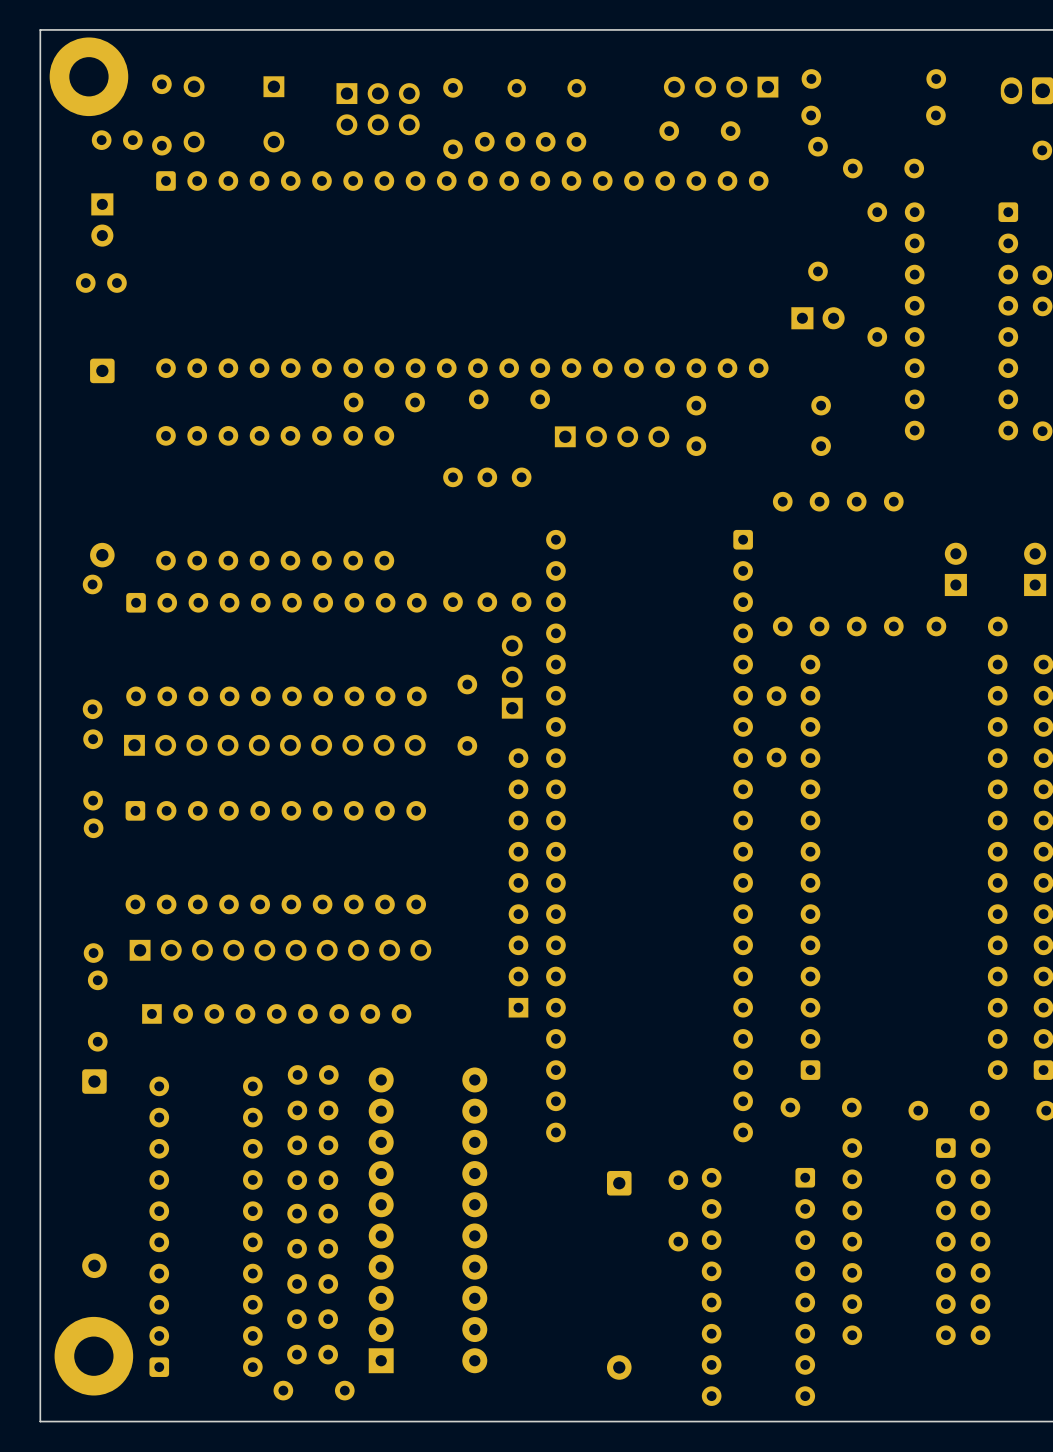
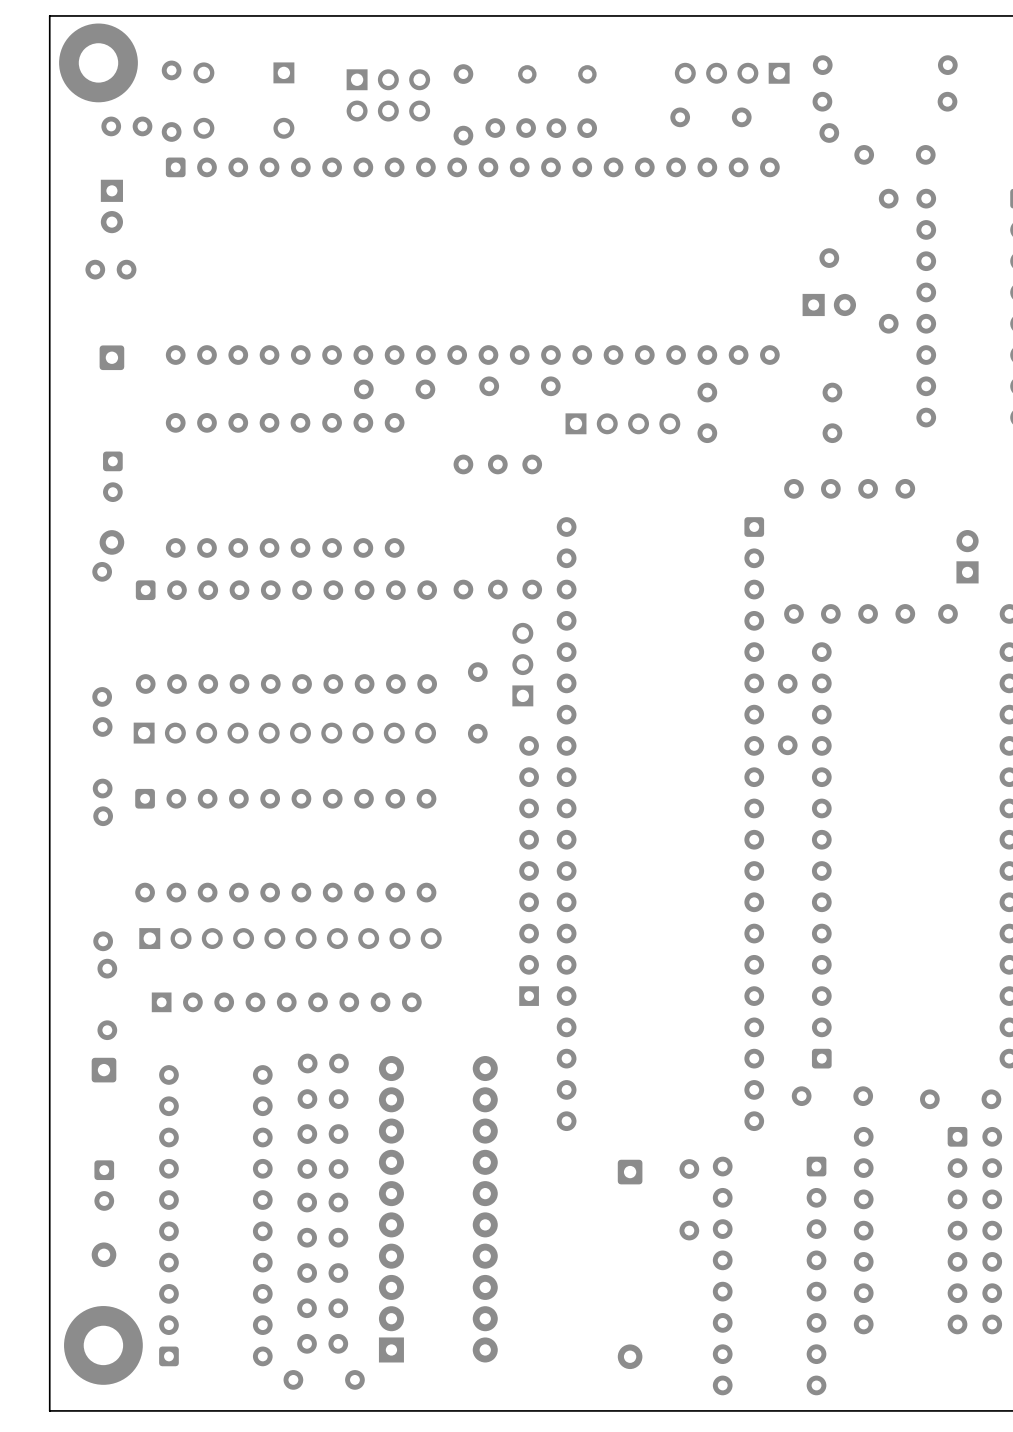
part: none -> (112, 476)
part: none -> (104, 1185)

